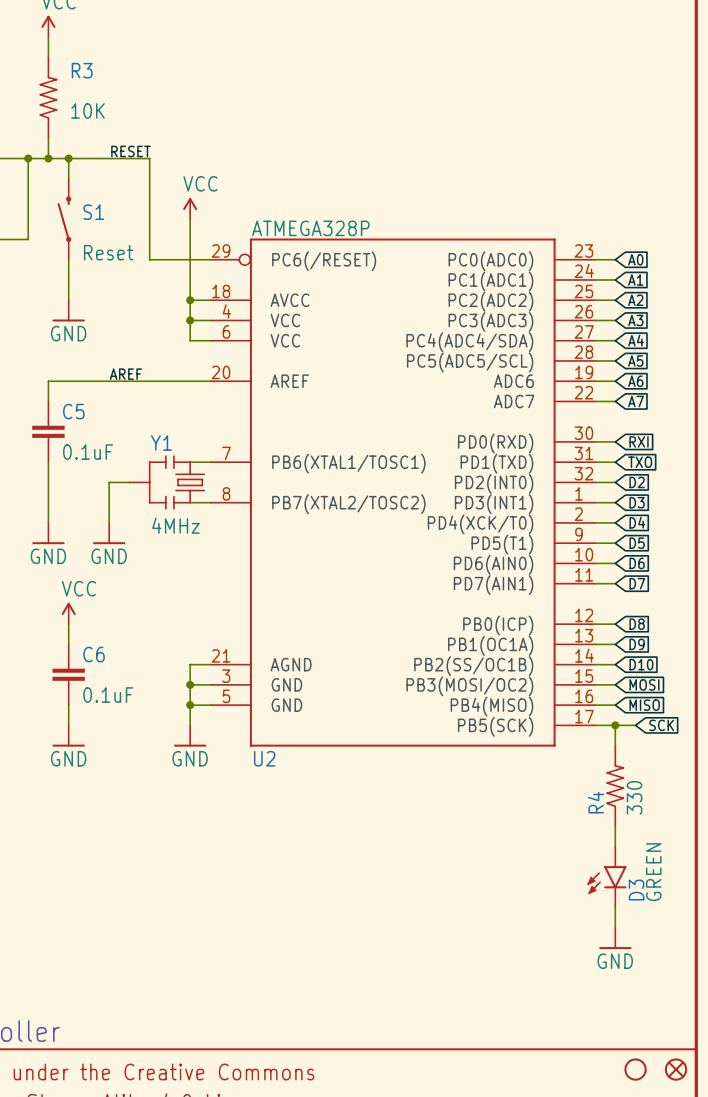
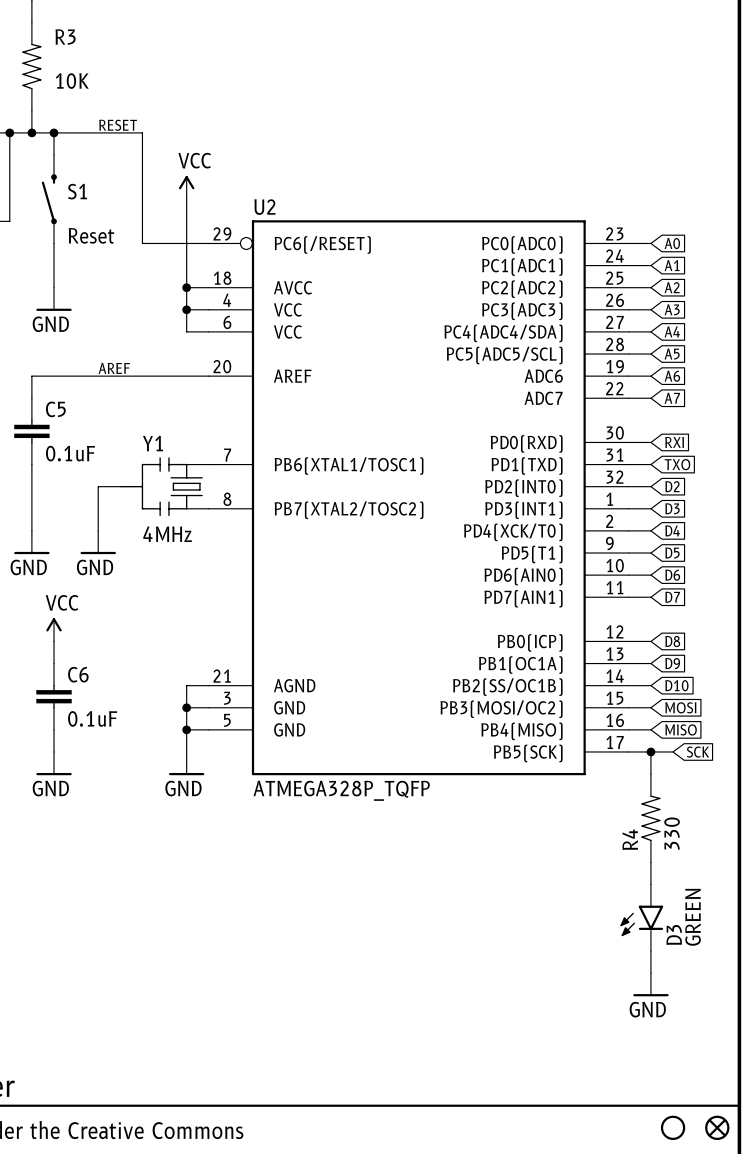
U2 value: ATMEGA328P (310, 228) -> ATMEGA328P_TQFP (341, 790)
U2 name position: U2 (264, 758) -> U2 (264, 207)

